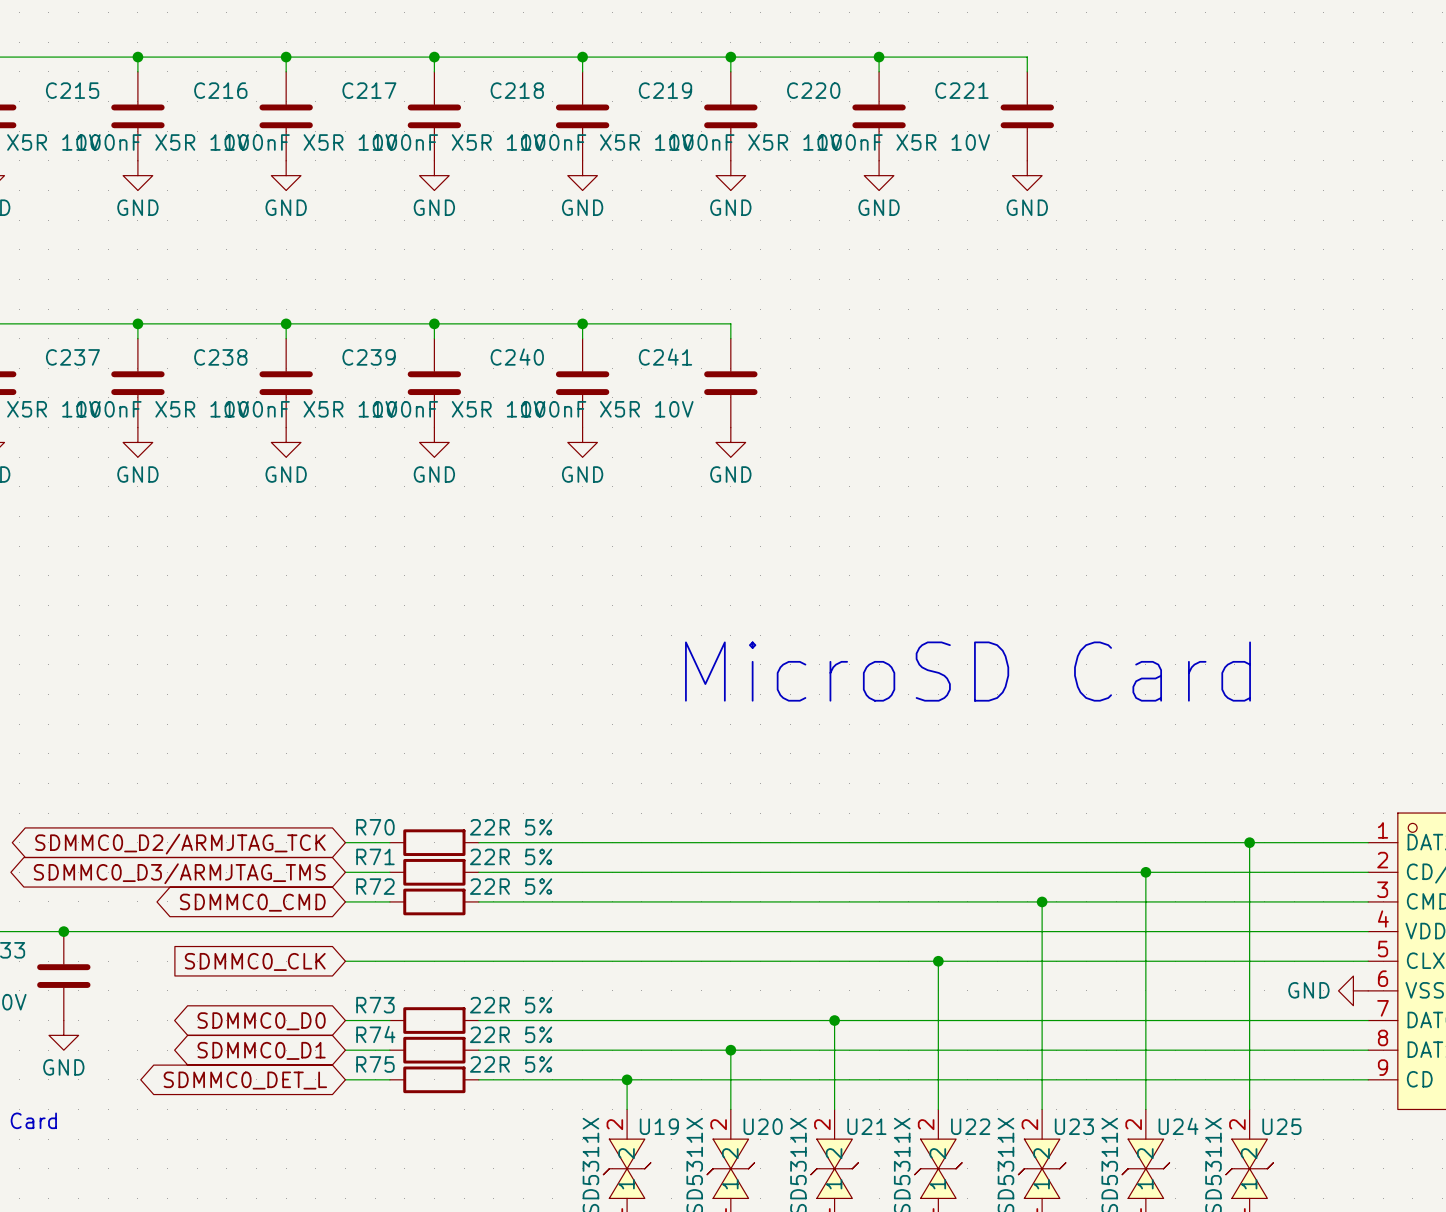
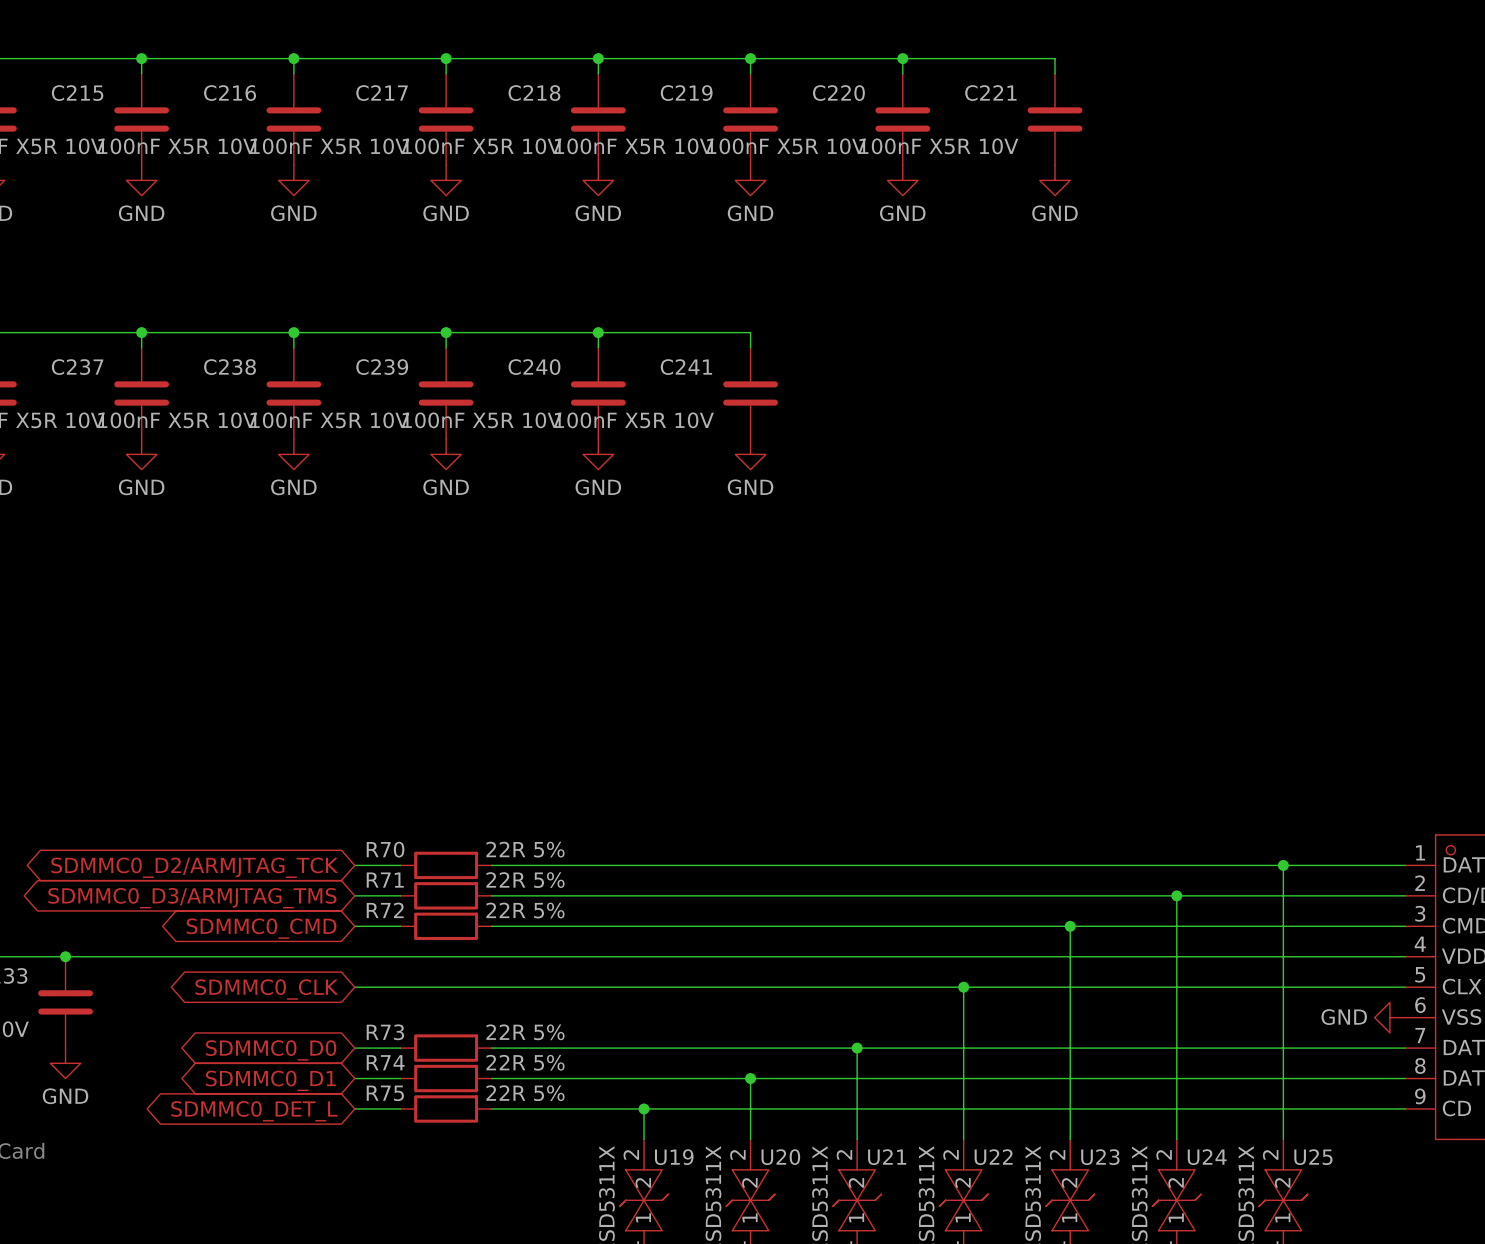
text: MicroSD Card (967, 671) -> none
global label shape: input (255, 961) -> bidirectional (266, 989)

